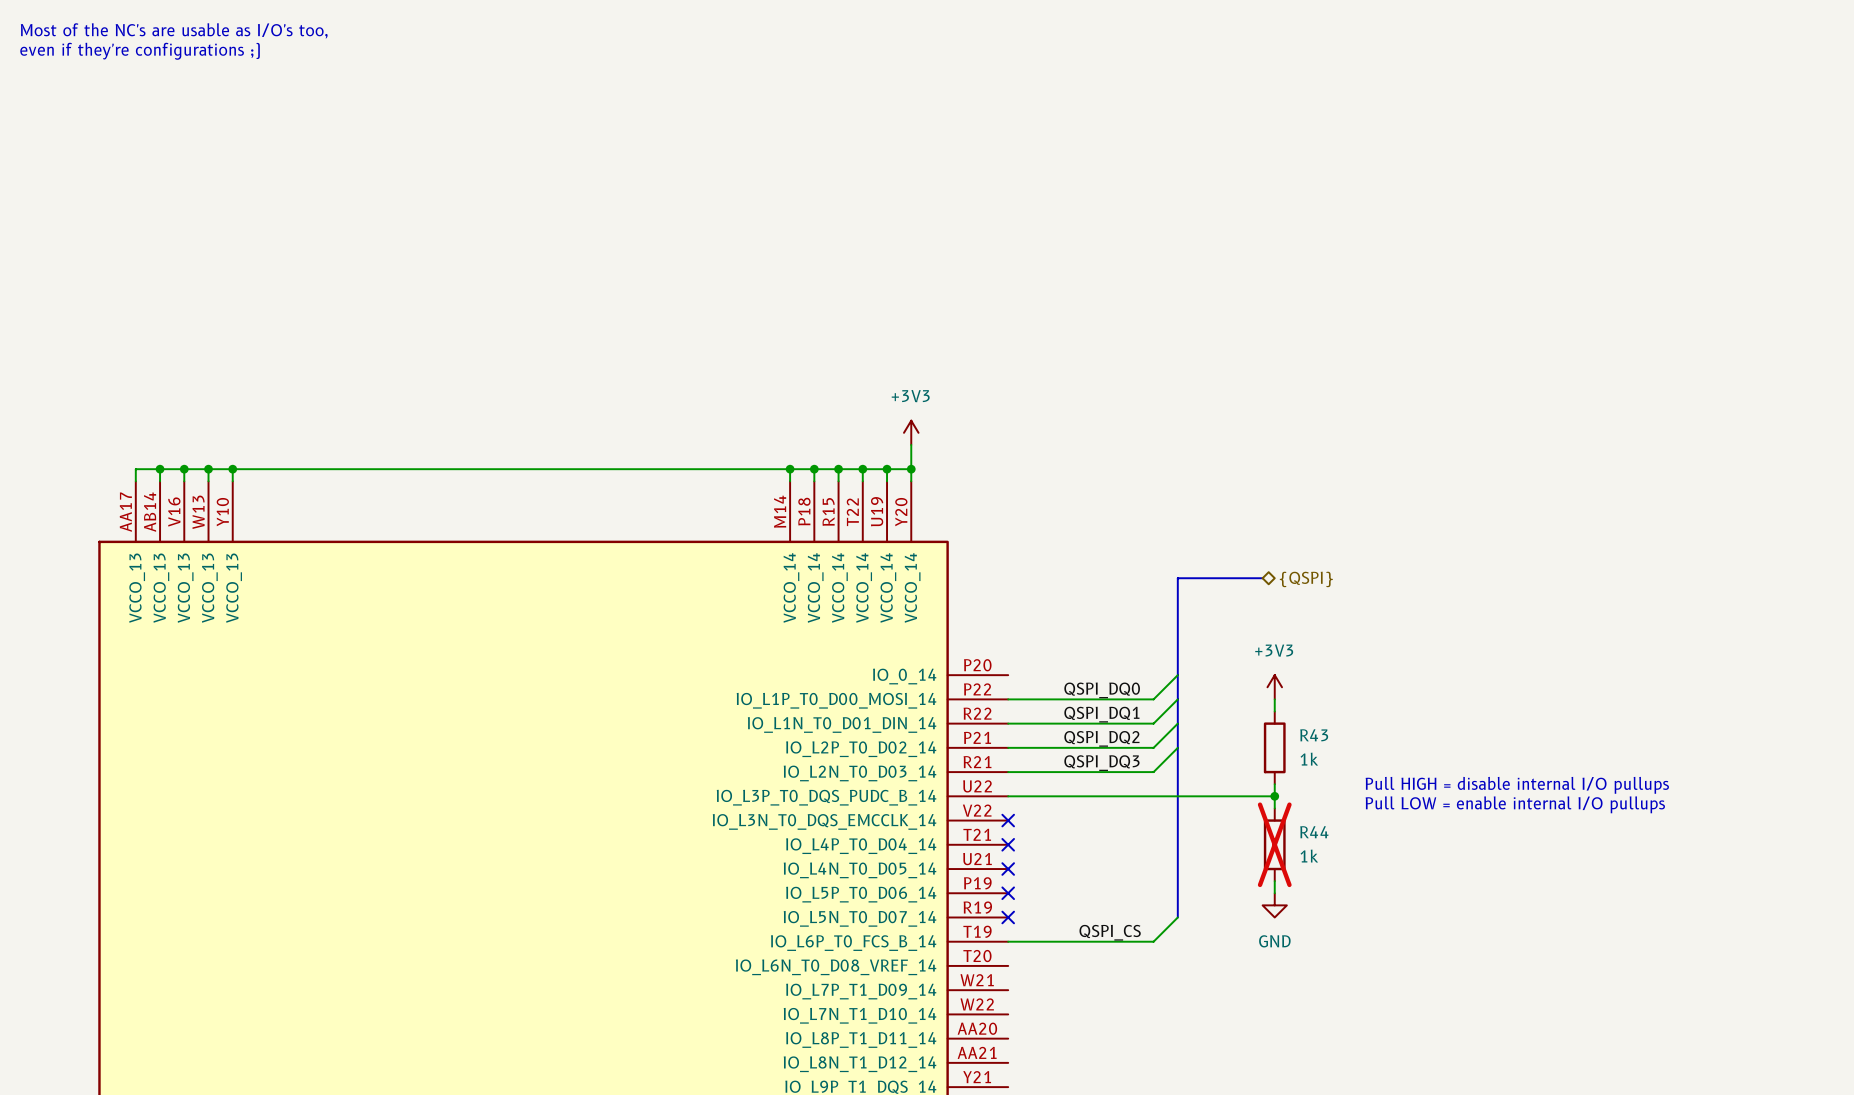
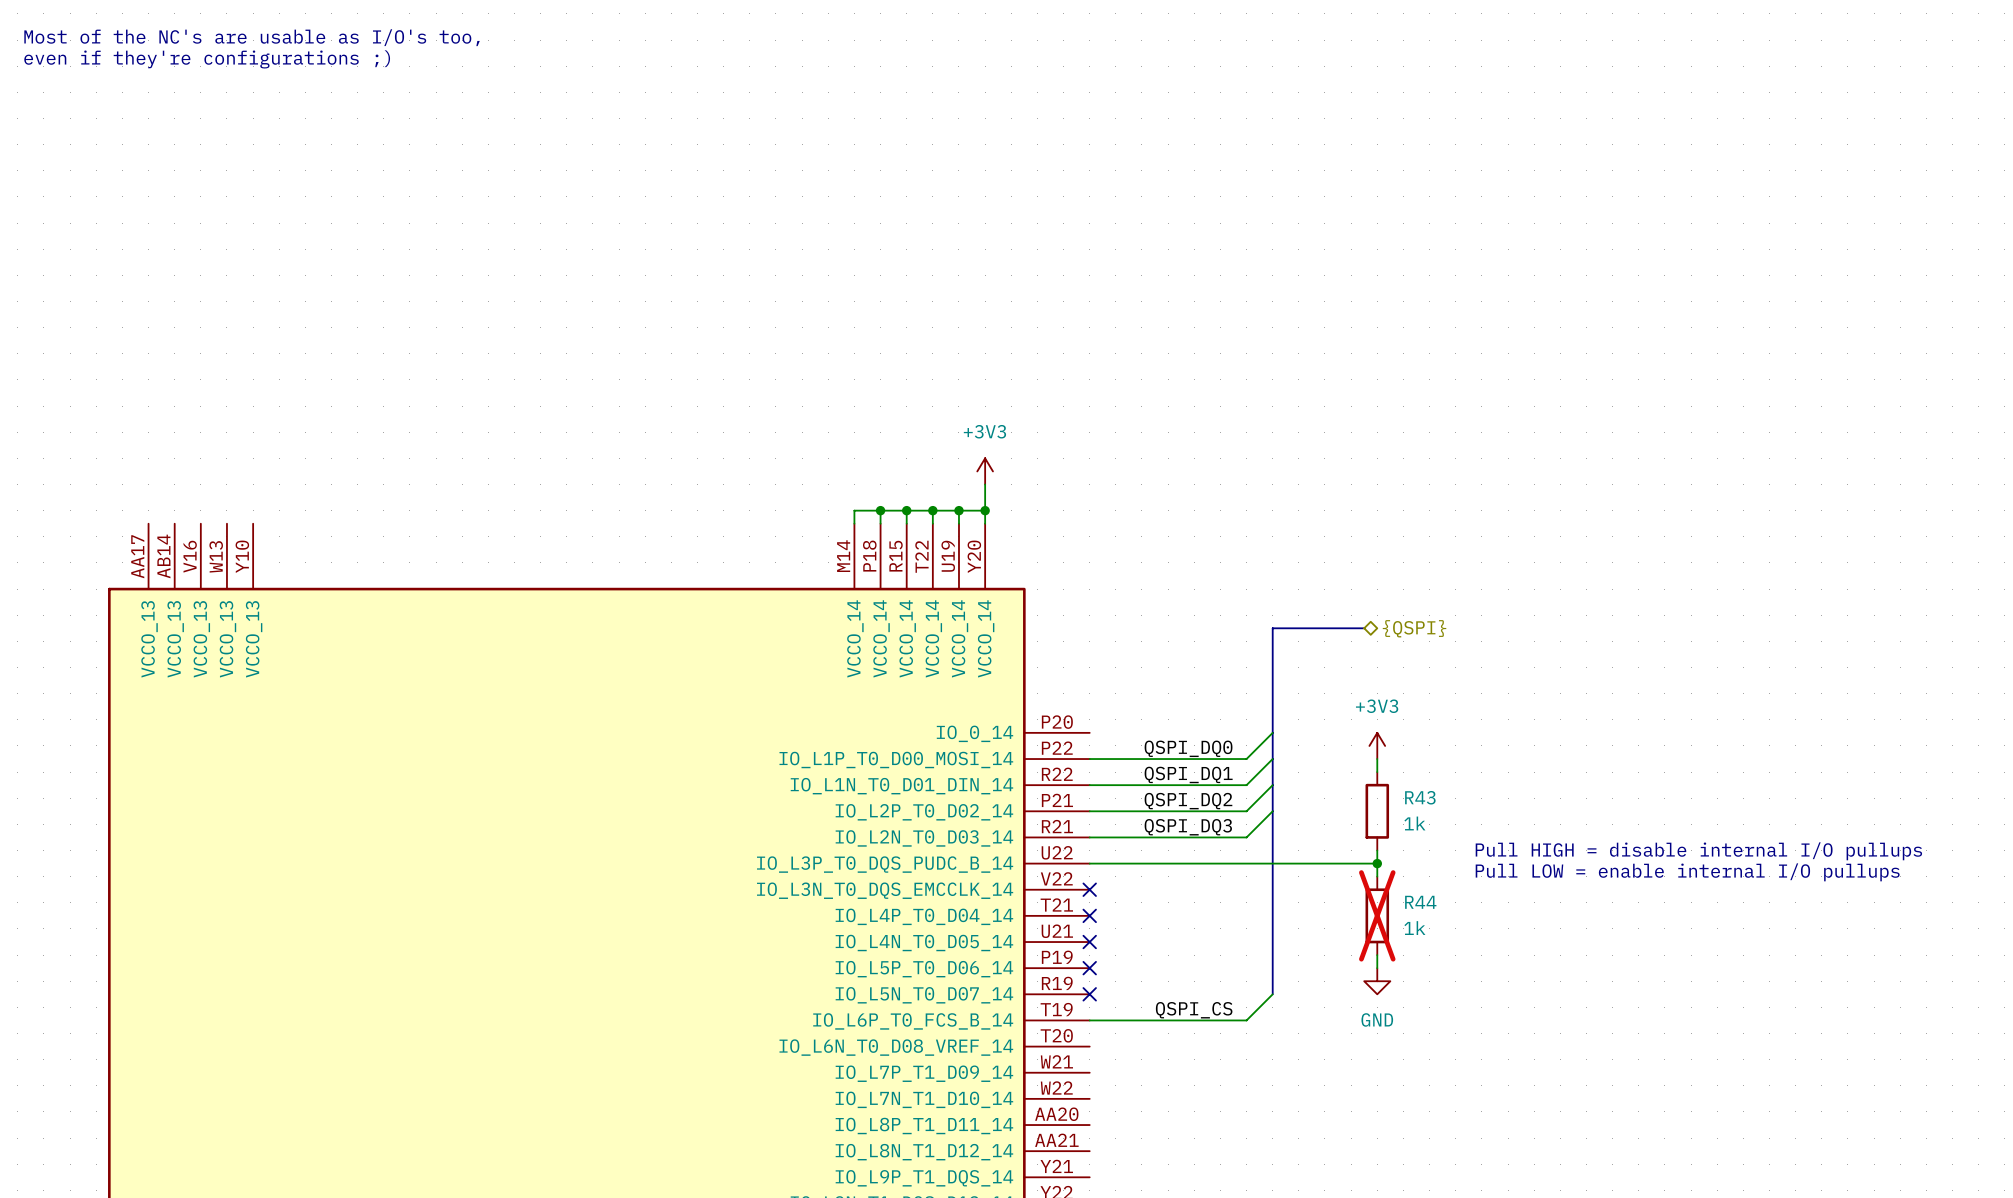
wire: (160, 469) (160, 481) -> none
junction: (160, 469) -> none
wire: (184, 469) (184, 481) -> none
junction: (184, 469) -> none
wire: (208, 469) (208, 481) -> none
junction: (208, 469) -> none
wire: (232, 469) (232, 481) -> none
junction: (232, 469) -> none
wire: (790, 469) (135, 469) (135, 481) -> none
junction: (790, 469) -> none

